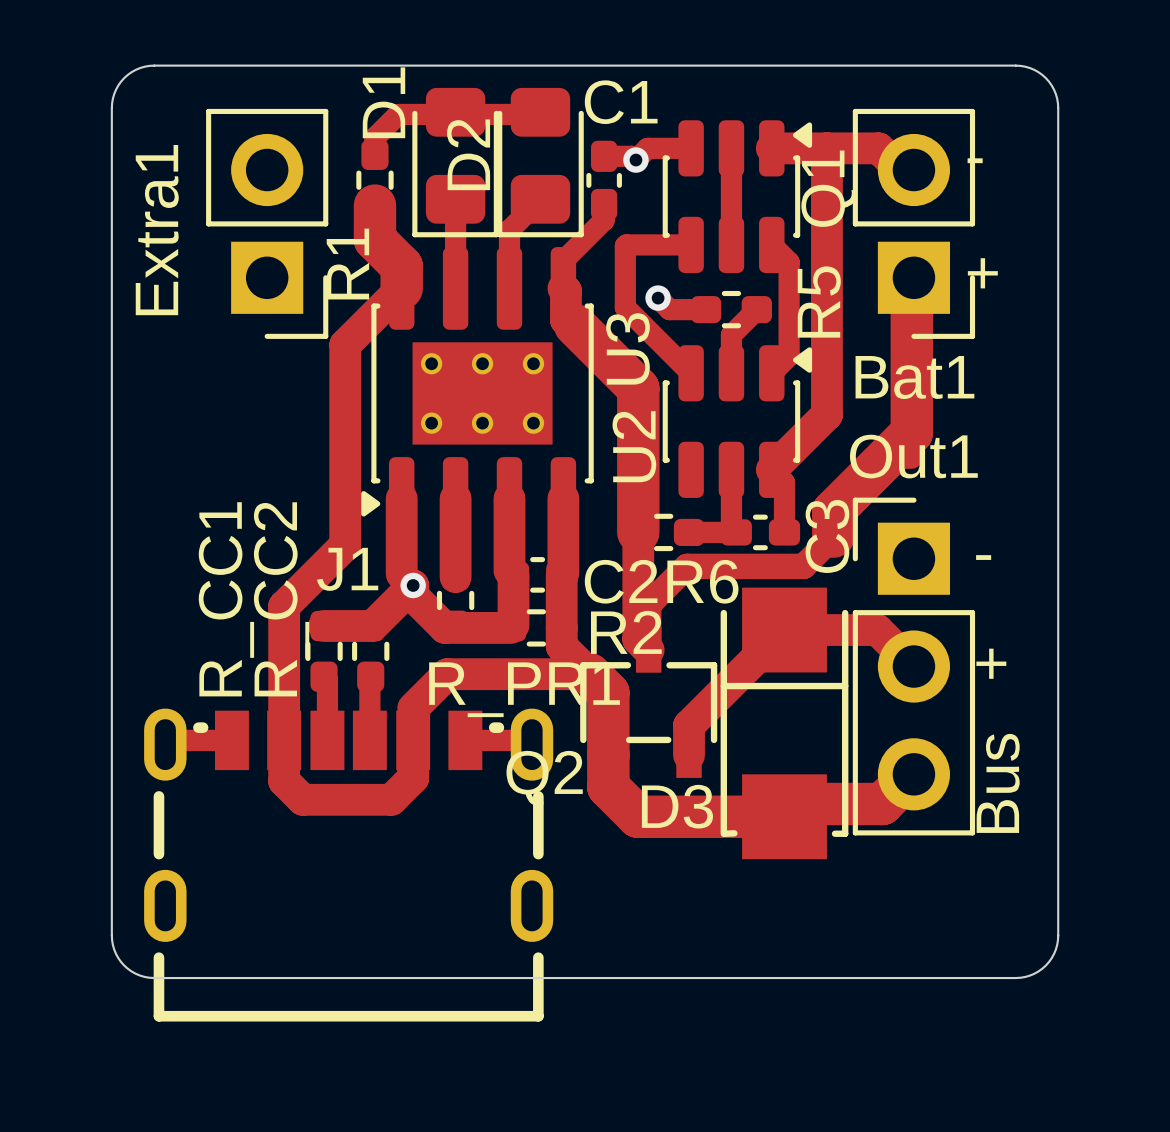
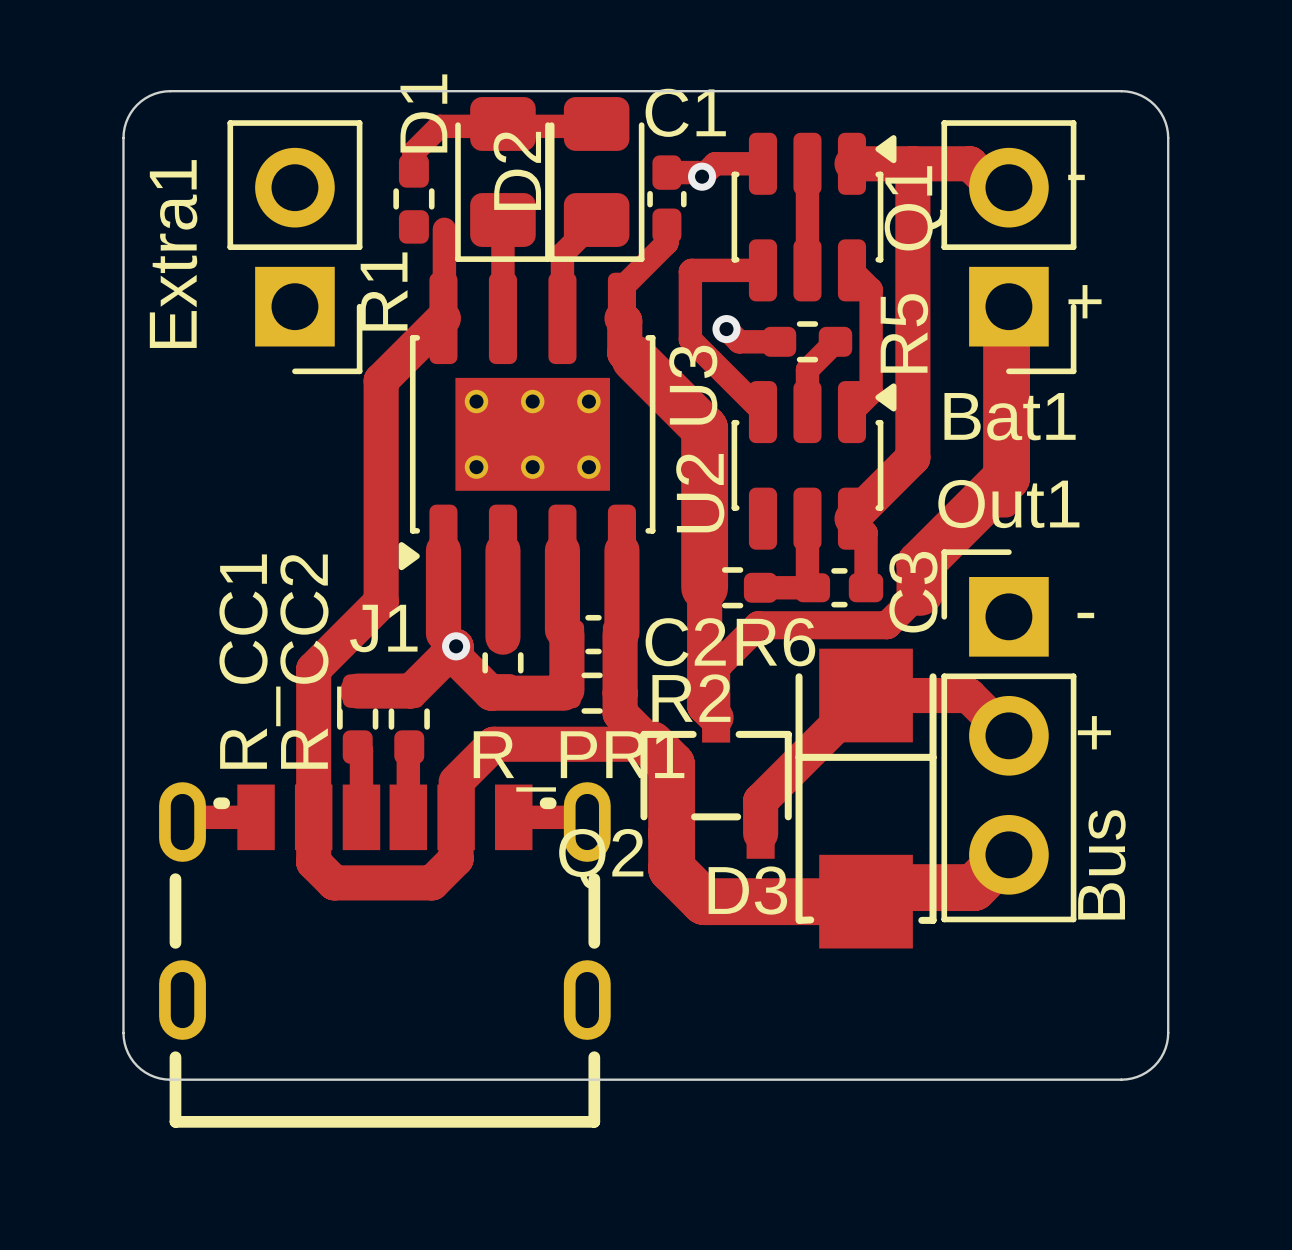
board edge: (111, 125) (112, 98) (121, 81) (135, 69) (154, 65) (1020, 65) (1038, 72) (1051, 85) (1057, 103) (1058, 125) -> (123, 138) (128, 117) (137, 104) (150, 95) (170, 91) (1121, 91) (1136, 93) (1154, 104) (1163, 117) (1168, 138)
top track: (374, 205) (374, 239) (401, 266) (401, 288) -> (444, 229) (444, 317)

